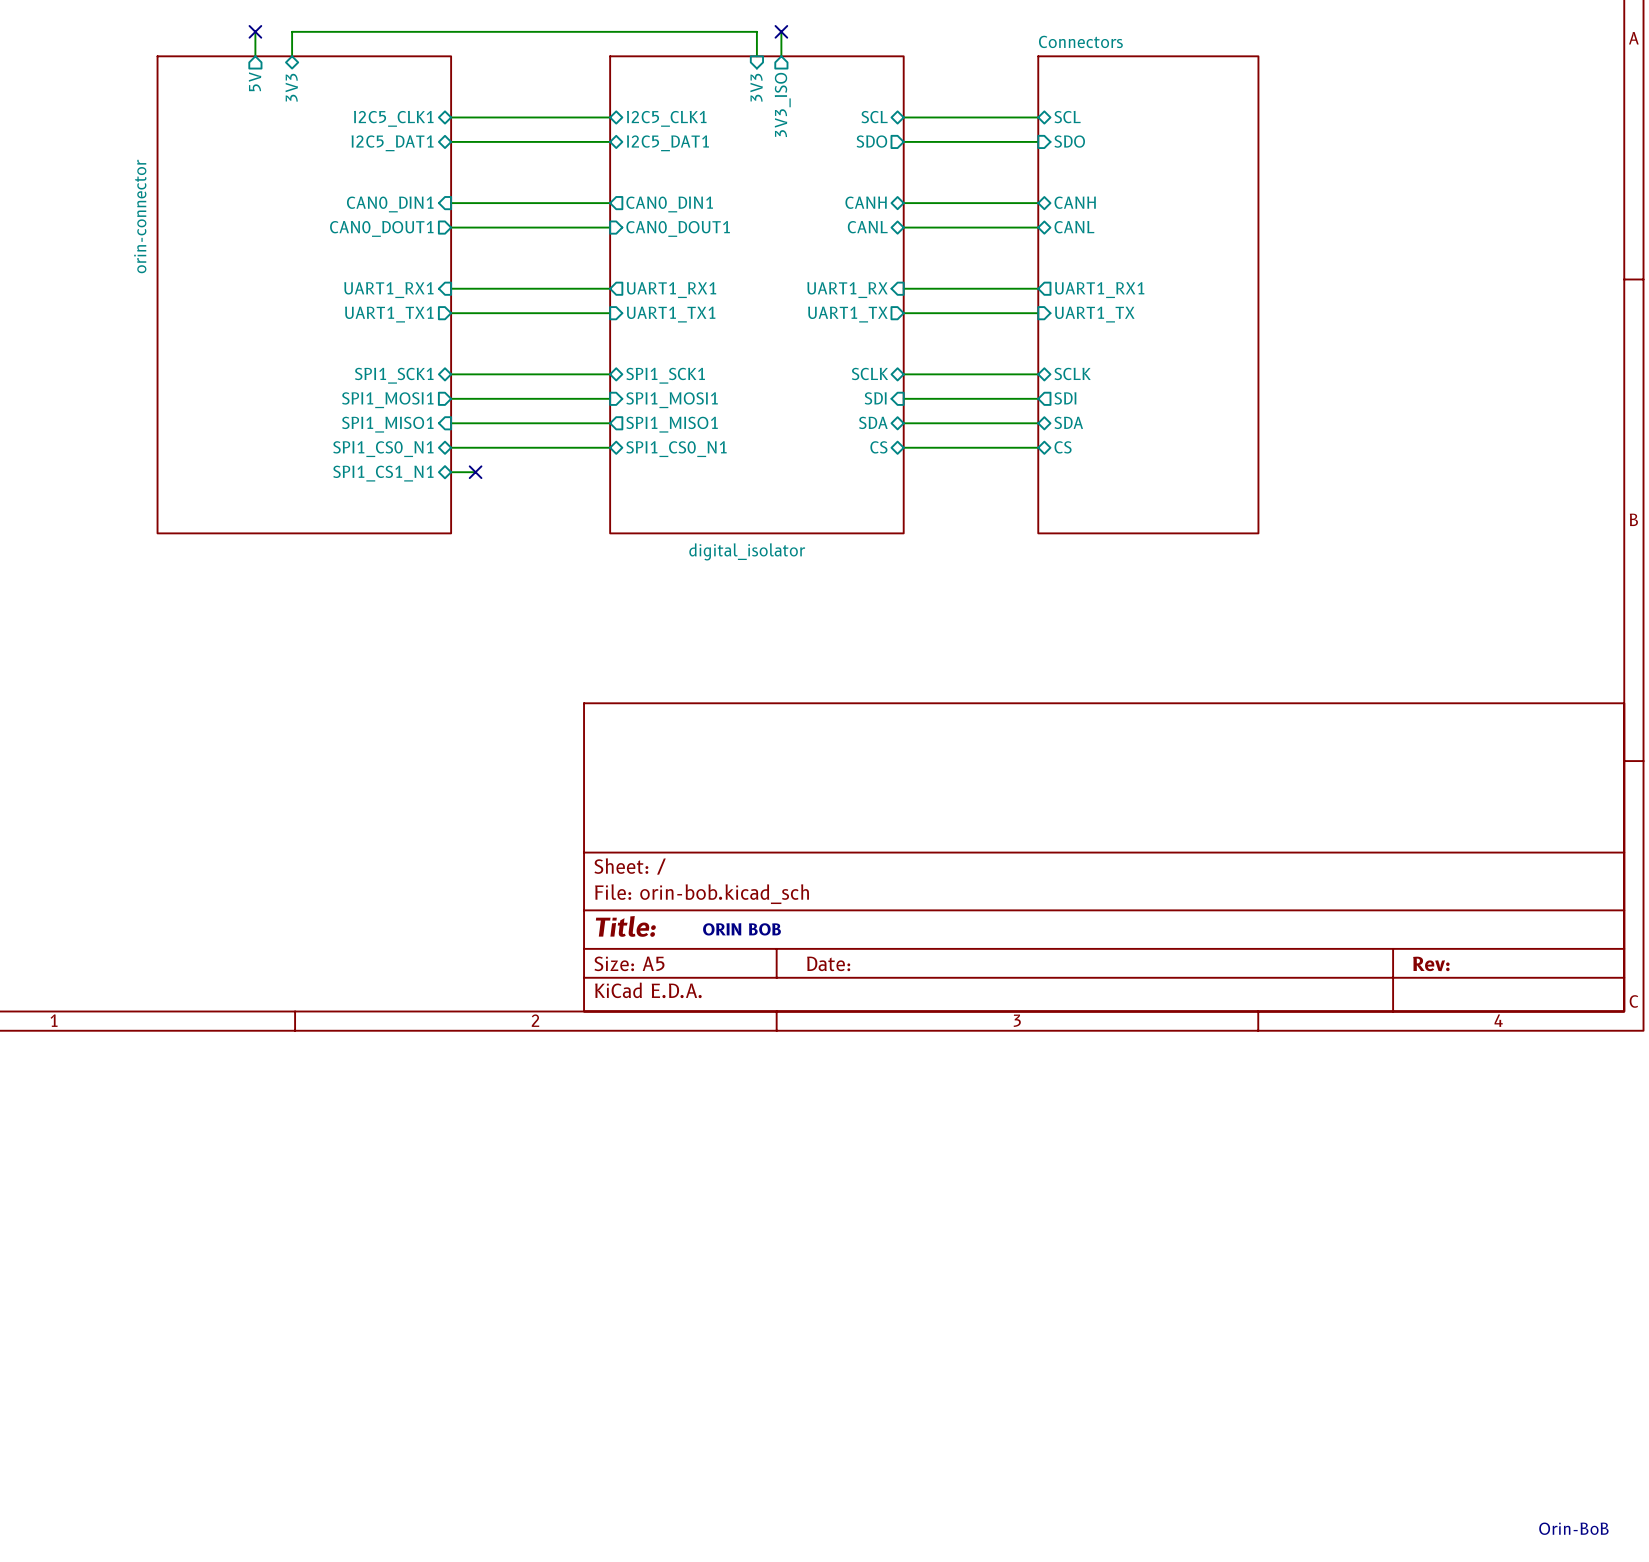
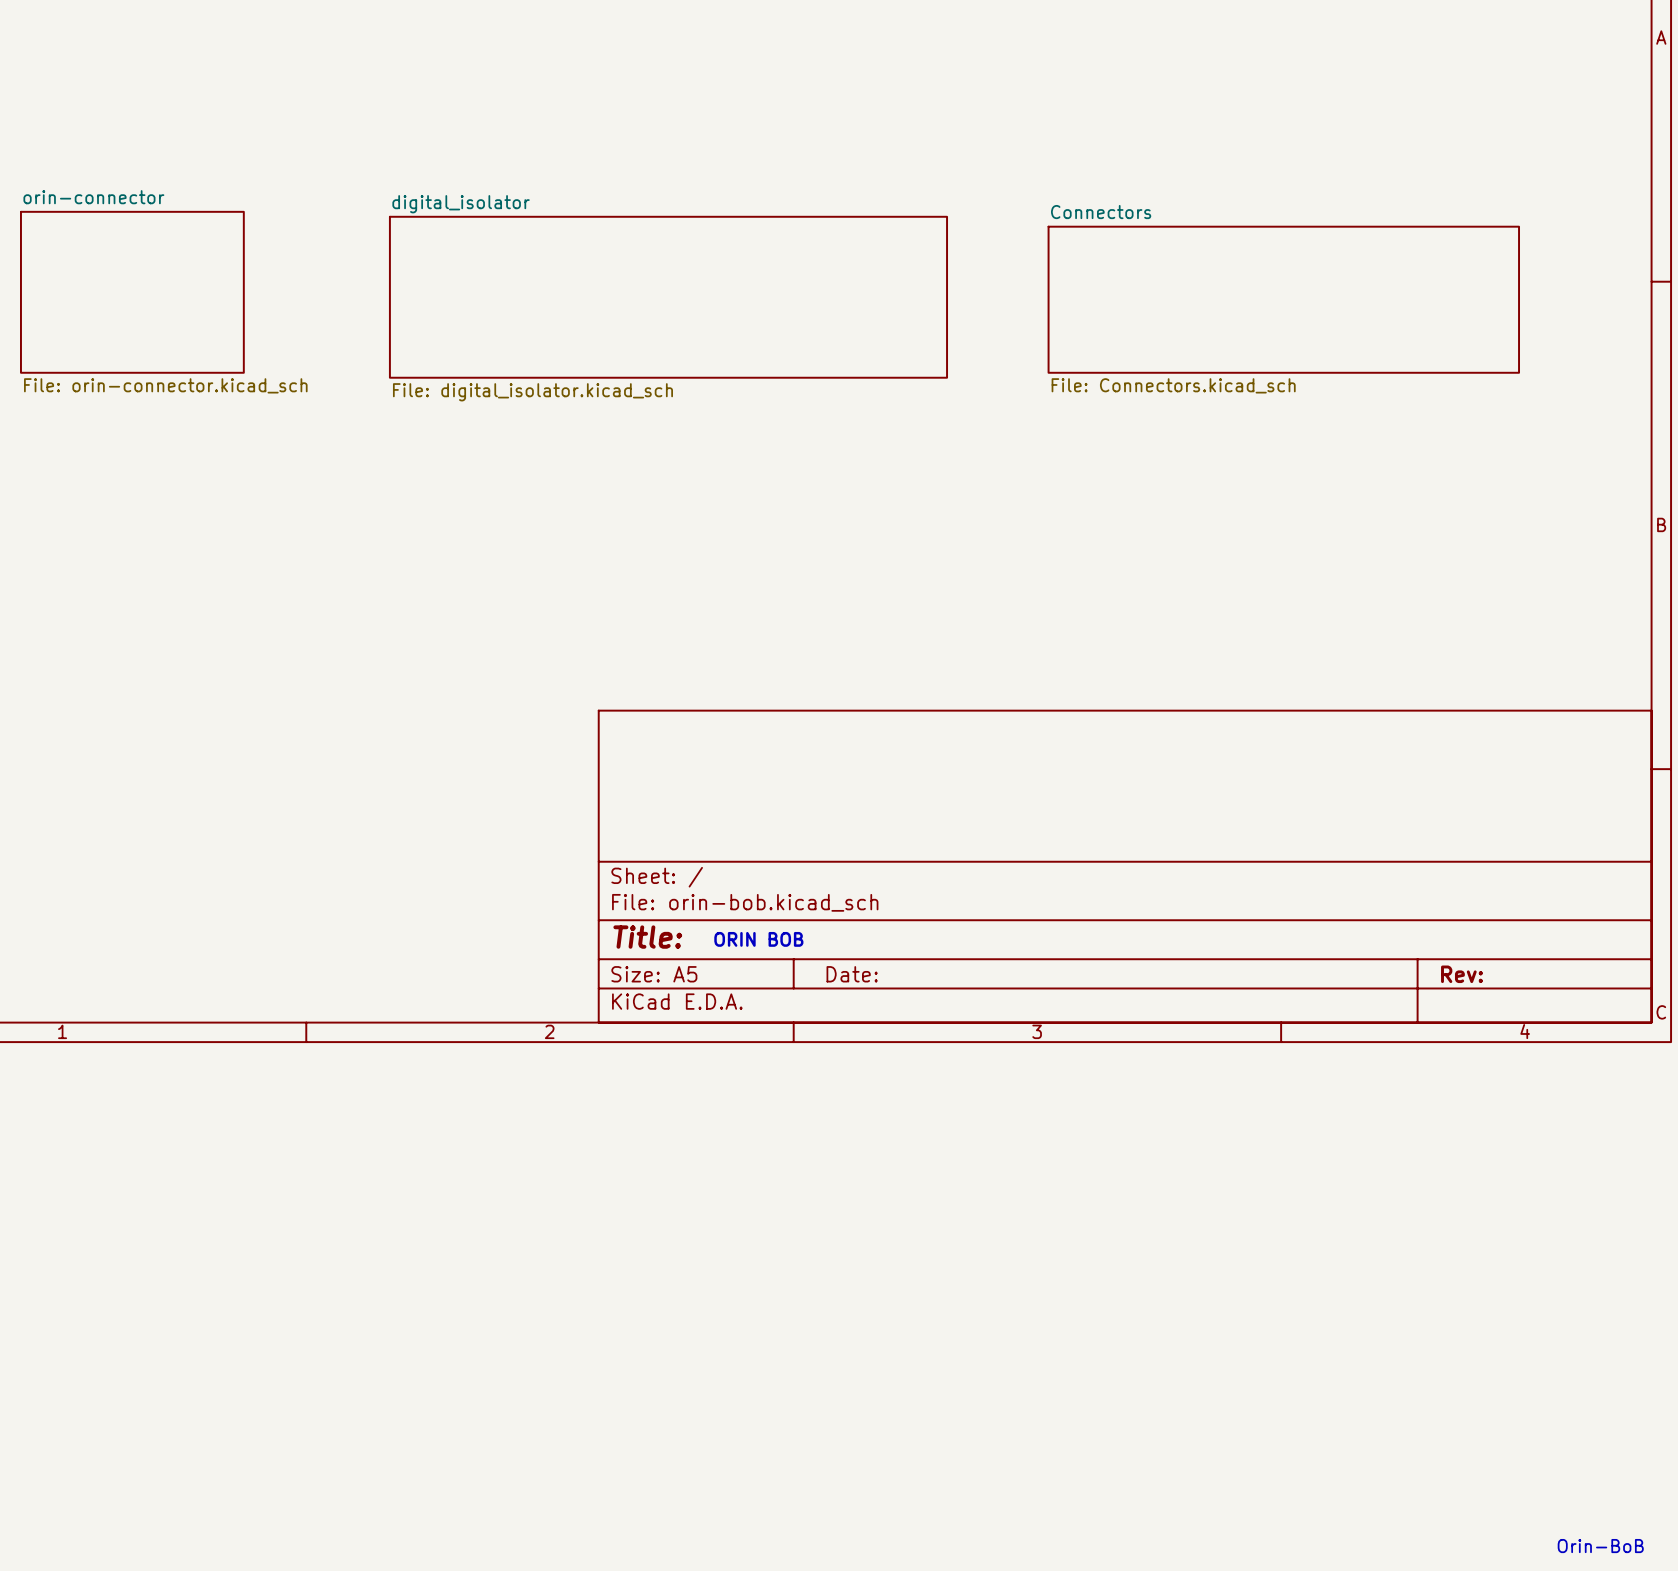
wire: (255, 31) (255, 56) -> none
no-connect mark: (255, 31) -> none
wire: (781, 31) (781, 56) -> none
no-connect mark: (781, 31) -> none
wire: (292, 56) (292, 31) (756, 31) (756, 56) -> none
sheet pin: 5V (255, 81) -> none
sheet pin: 3V3 (291, 87) -> none
sheet pin: 3V3 (756, 87) -> none
sheet pin: 3V3_ISO (782, 104) -> none
wire: (451, 117) (610, 117) -> none
sheet pin: SCL (874, 117) -> none
wire: (903, 117) (1038, 117) -> none
sheet pin: SCL (1067, 117) -> none
sheet pin: I2C5_CLK1 (393, 118) -> none
sheet pin: I2C5_CLK1 (666, 118) -> none
wire: (451, 141) (610, 141) -> none
sheet pin: SDO (871, 141) -> none
wire: (903, 141) (1038, 141) -> none
sheet pin: SDO (1069, 141) -> none
sheet pin: I2C5_DAT1 (392, 143) -> none
sheet pin: I2C5_DAT1 (667, 143) -> none
sheet pin: CANH (866, 202) -> none
sheet pin: CANH (1075, 202) -> none
wire: (451, 203) (610, 203) -> none
wire: (903, 203) (1038, 203) -> none
sheet pin: CAN0_DIN1 (390, 204) -> none
sheet pin: CAN0_DIN1 (669, 204) -> none
wire: (451, 227) (610, 227) -> none
sheet pin: CANL (867, 227) -> none
wire: (903, 227) (1038, 227) -> none
sheet pin: CANL (1074, 227) -> none
sheet pin: CAN0_DOUT1 (381, 228) -> none
sheet pin: CAN0_DOUT1 (678, 228) -> none
wire: (451, 288) (610, 288) -> none
wire: (903, 288) (1038, 288) -> none
sheet orin-connector: none -> File: orin-connector.kicad_sch (132, 292)
sheet pin: UART1_RX1 (388, 290) -> none
sheet pin: UART1_RX1 (671, 290) -> none
sheet pin: UART1_RX (847, 290) -> none
sheet pin: UART1_RX1 (1099, 290) -> none
sheet orin-connector: (304, 294) -> none
sheet digital_isolator: none -> File: digital_isolator.kicad_sch (668, 297)
sheet digital_isolator: (756, 294) -> none
sheet Connectors: (1148, 294) -> none
sheet Connectors: none -> File: Connectors.kicad_sch (1283, 299)
wire: (451, 313) (610, 313) -> none
wire: (903, 313) (1038, 313) -> none
sheet pin: UART1_TX1 (389, 314) -> none
sheet pin: UART1_TX1 (671, 314) -> none
sheet pin: UART1_TX (847, 314) -> none
sheet pin: UART1_TX (1094, 314) -> none
sheet pin: SCLK (869, 373) -> none
sheet pin: SCLK (1072, 373) -> none
wire: (903, 374) (1038, 374) -> none
sheet pin: SPI1_SCK1 (394, 375) -> none
sheet pin: SPI1_SCK1 (665, 375) -> none
wire: (451, 398) (610, 398) -> none
sheet pin: SDI (875, 398) -> none
wire: (903, 398) (1038, 398) -> none
sheet pin: SDI (1065, 398) -> none
sheet pin: SPI1_MOSI1 (387, 400) -> none
sheet pin: SPI1_MOSI1 (672, 400) -> none
sheet pin: SDA (873, 422) -> none
sheet pin: SDA (1068, 422) -> none
wire: (451, 423) (610, 423) -> none
wire: (903, 423) (1038, 423) -> none
sheet pin: SPI1_MISO1 (387, 424) -> none
sheet pin: SPI1_MISO1 (672, 424) -> none
wire: (451, 447) (610, 447) -> none
sheet pin: CS (878, 447) -> none
wire: (903, 447) (1038, 447) -> none
sheet pin: CS (1063, 447) -> none
sheet pin: SPI1_CS0_N1 (383, 449) -> none
sheet pin: SPI1_CS0_N1 (676, 449) -> none
wire: (451, 472) (475, 472) -> none
no-connect mark: (475, 472) -> none
sheet pin: SPI1_CS1_N1 (383, 473) -> none

